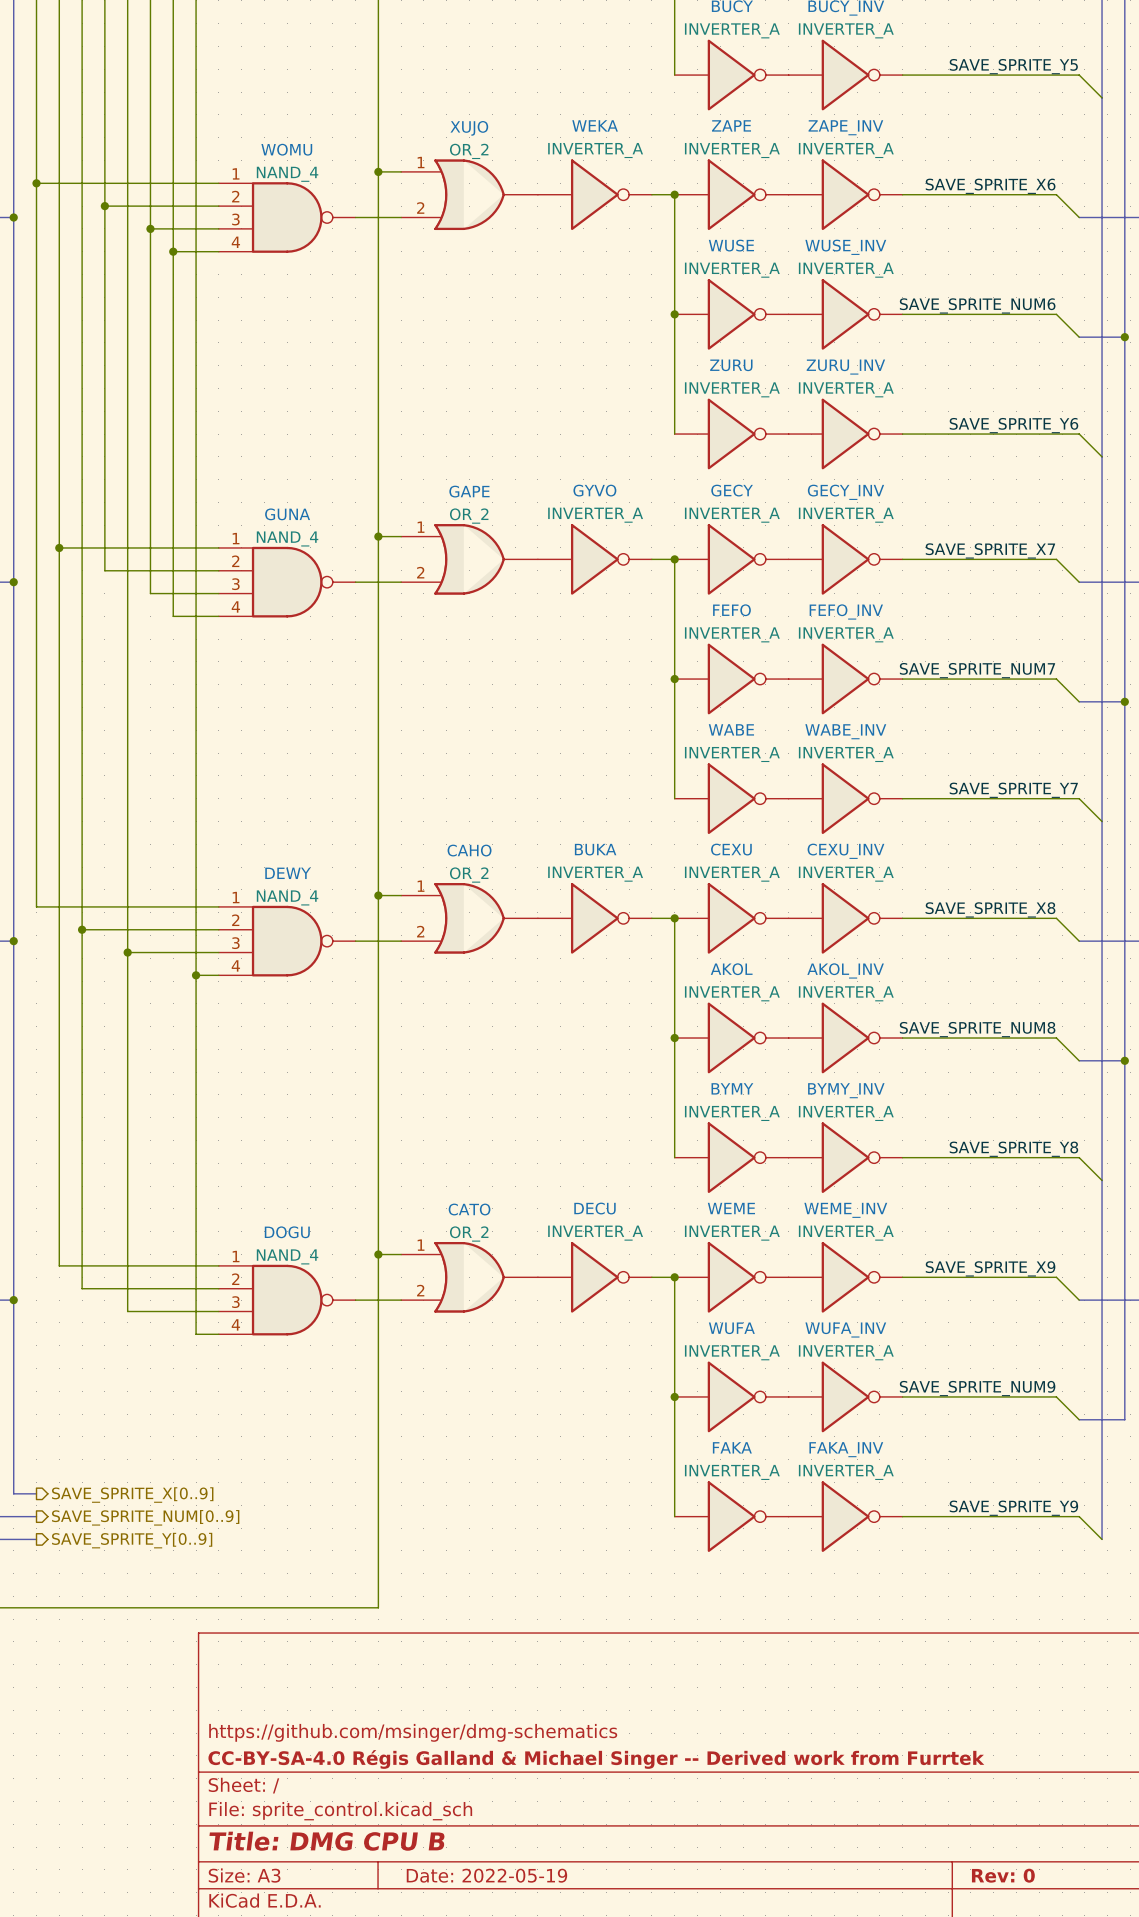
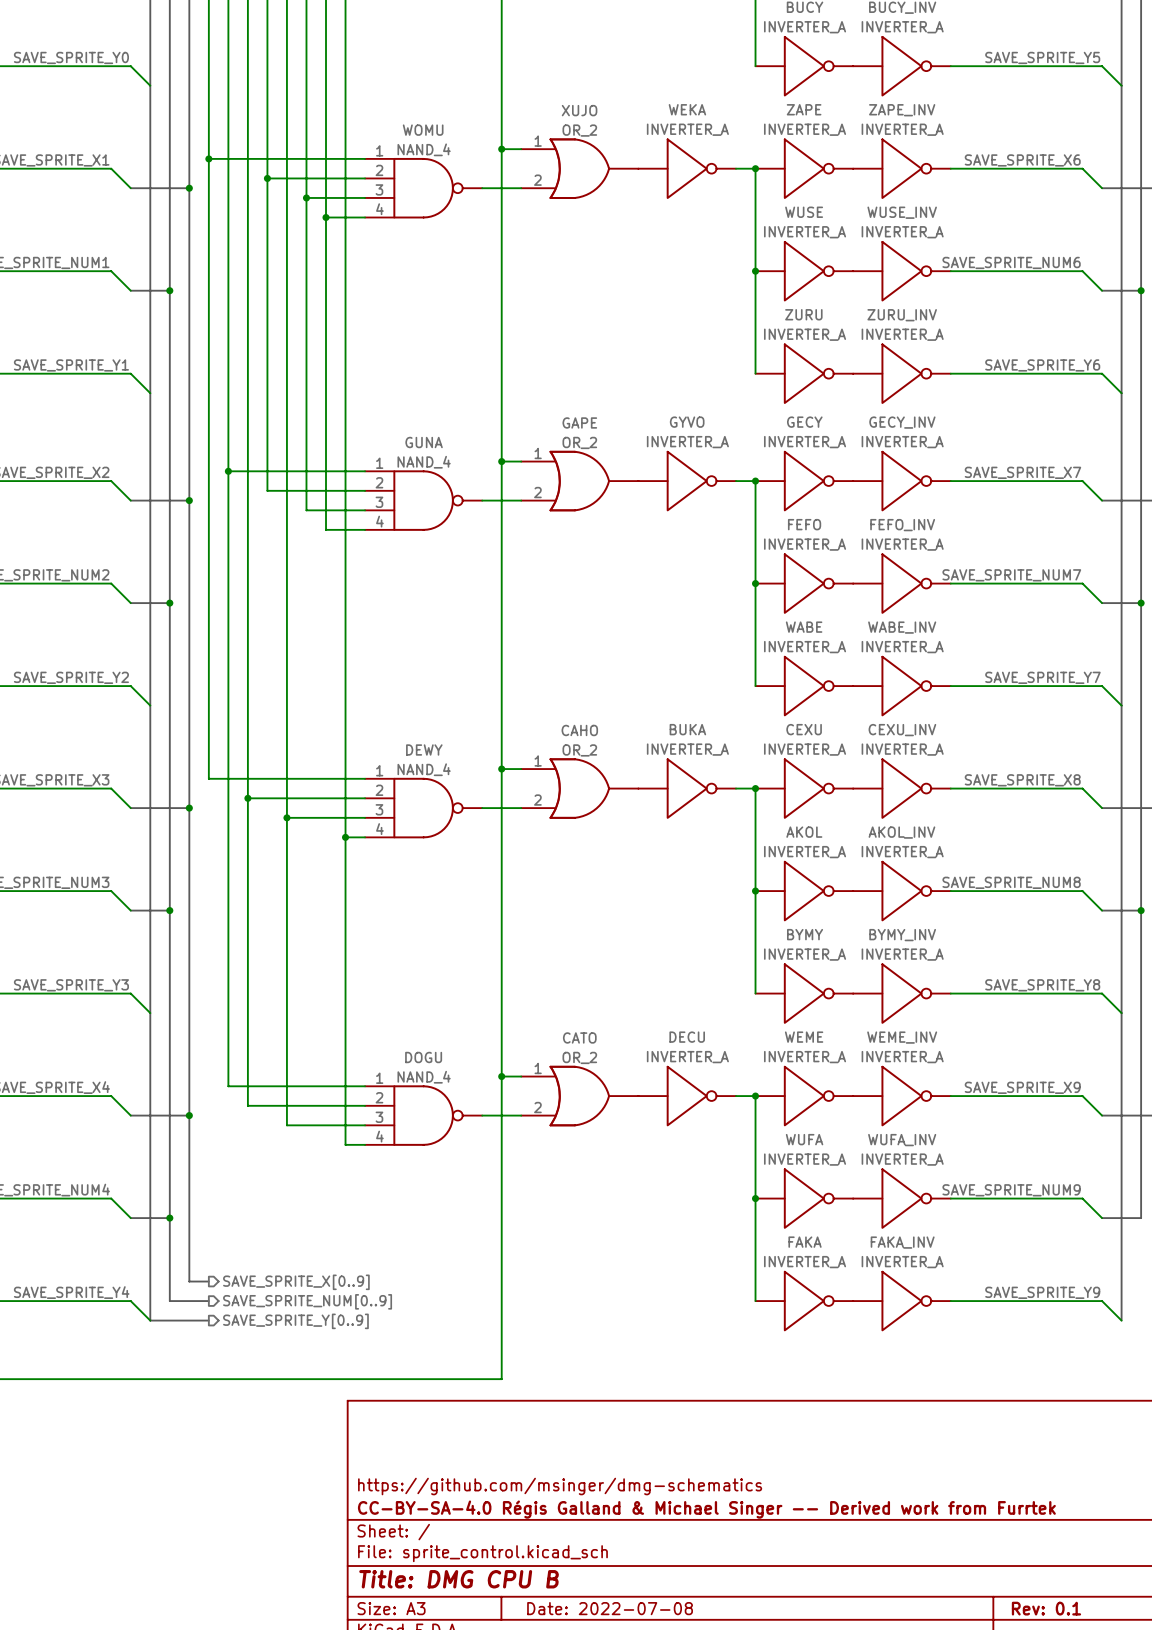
title block: Date: 2022-05-19 (486, 1875) -> Date: 2022-07-08 (610, 1608)
title block: Rev: 0 (1003, 1875) -> Rev: 0.1 (1046, 1608)

